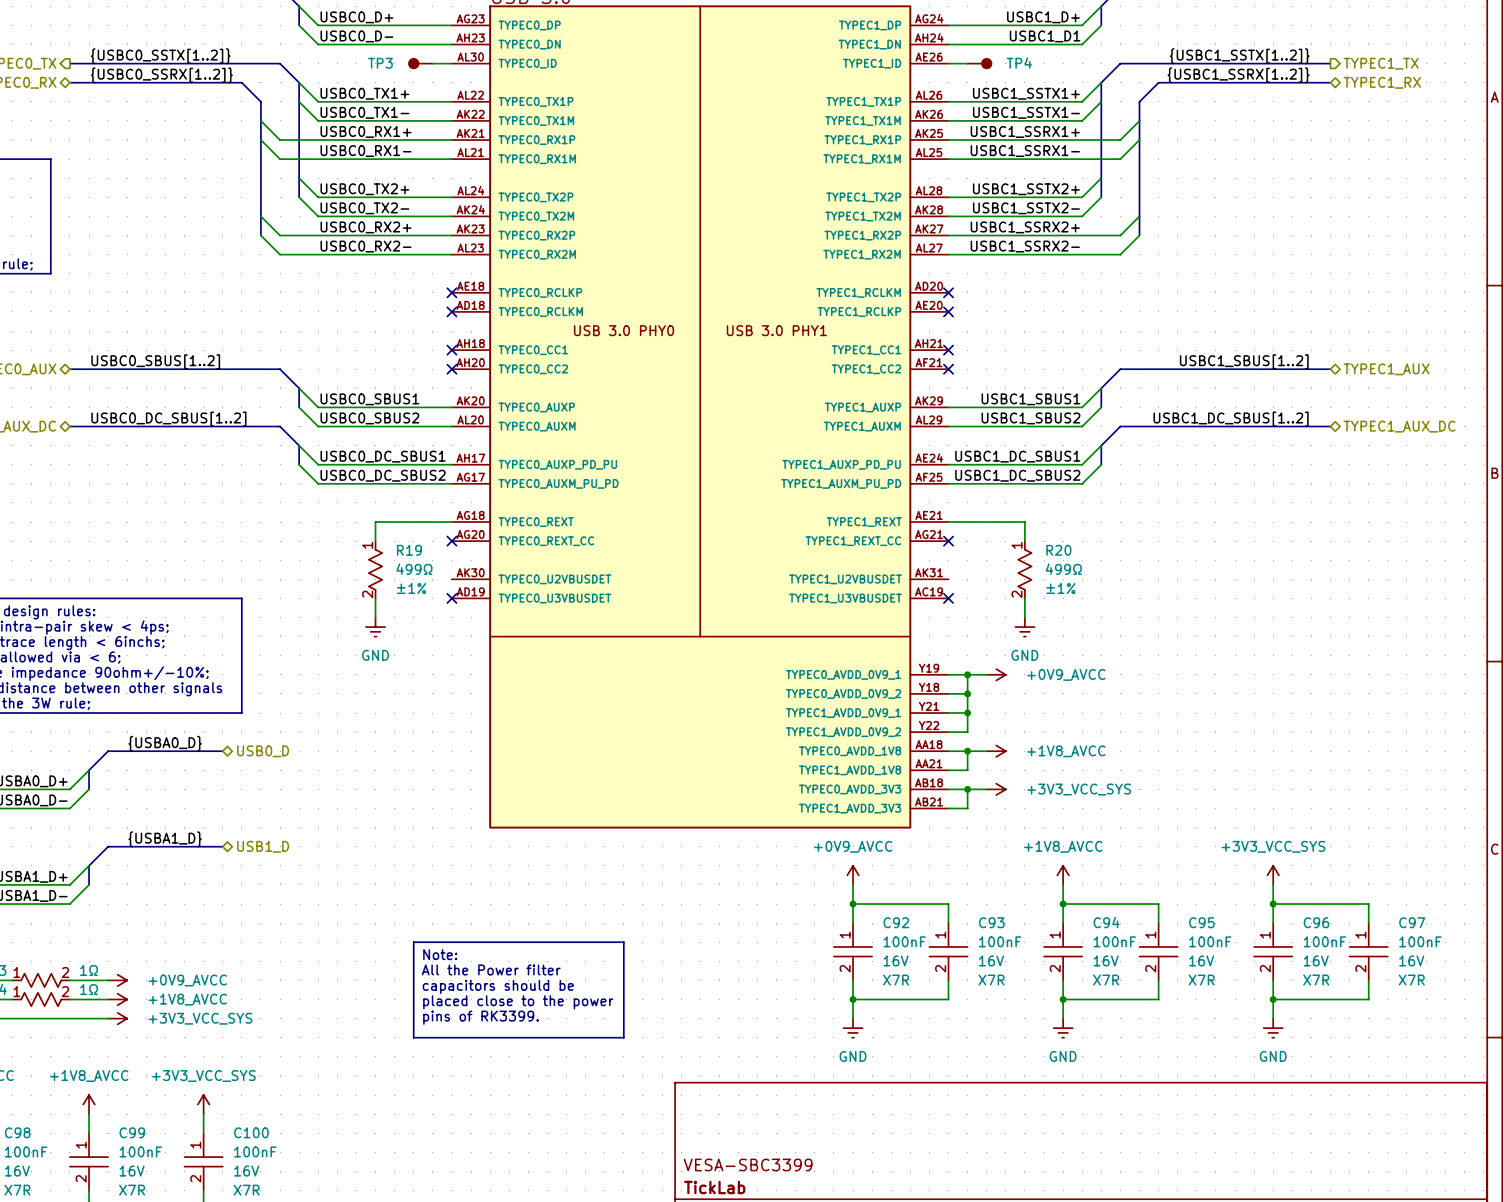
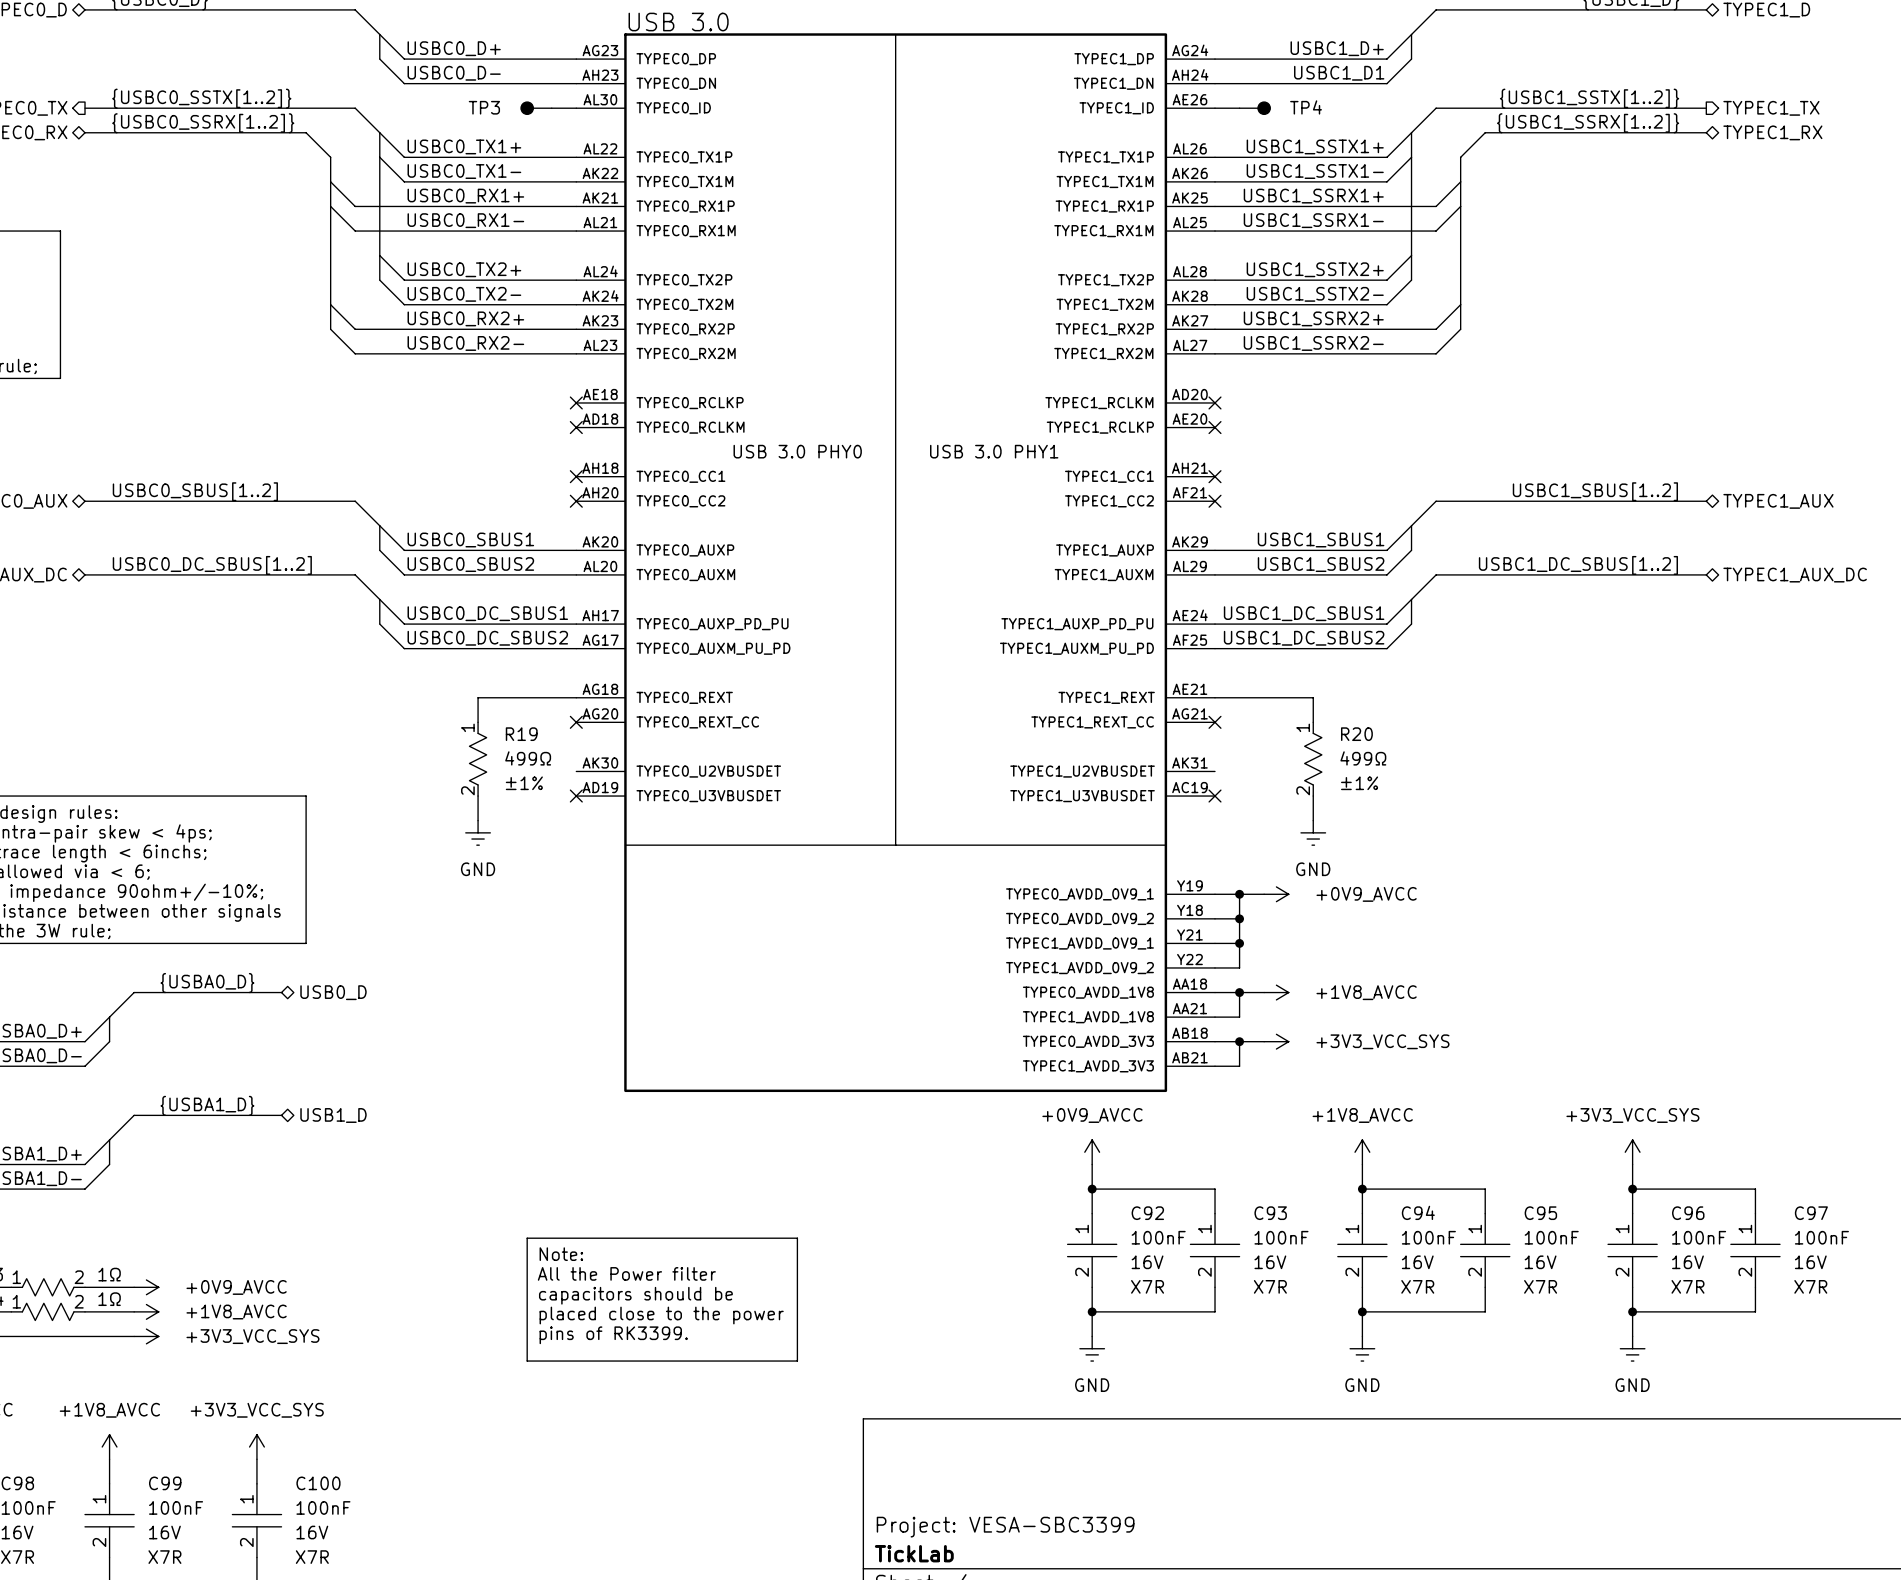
title block: VESA-SBC3399 (748, 1164) -> Project: VESA-SBC3399 (1005, 1527)

